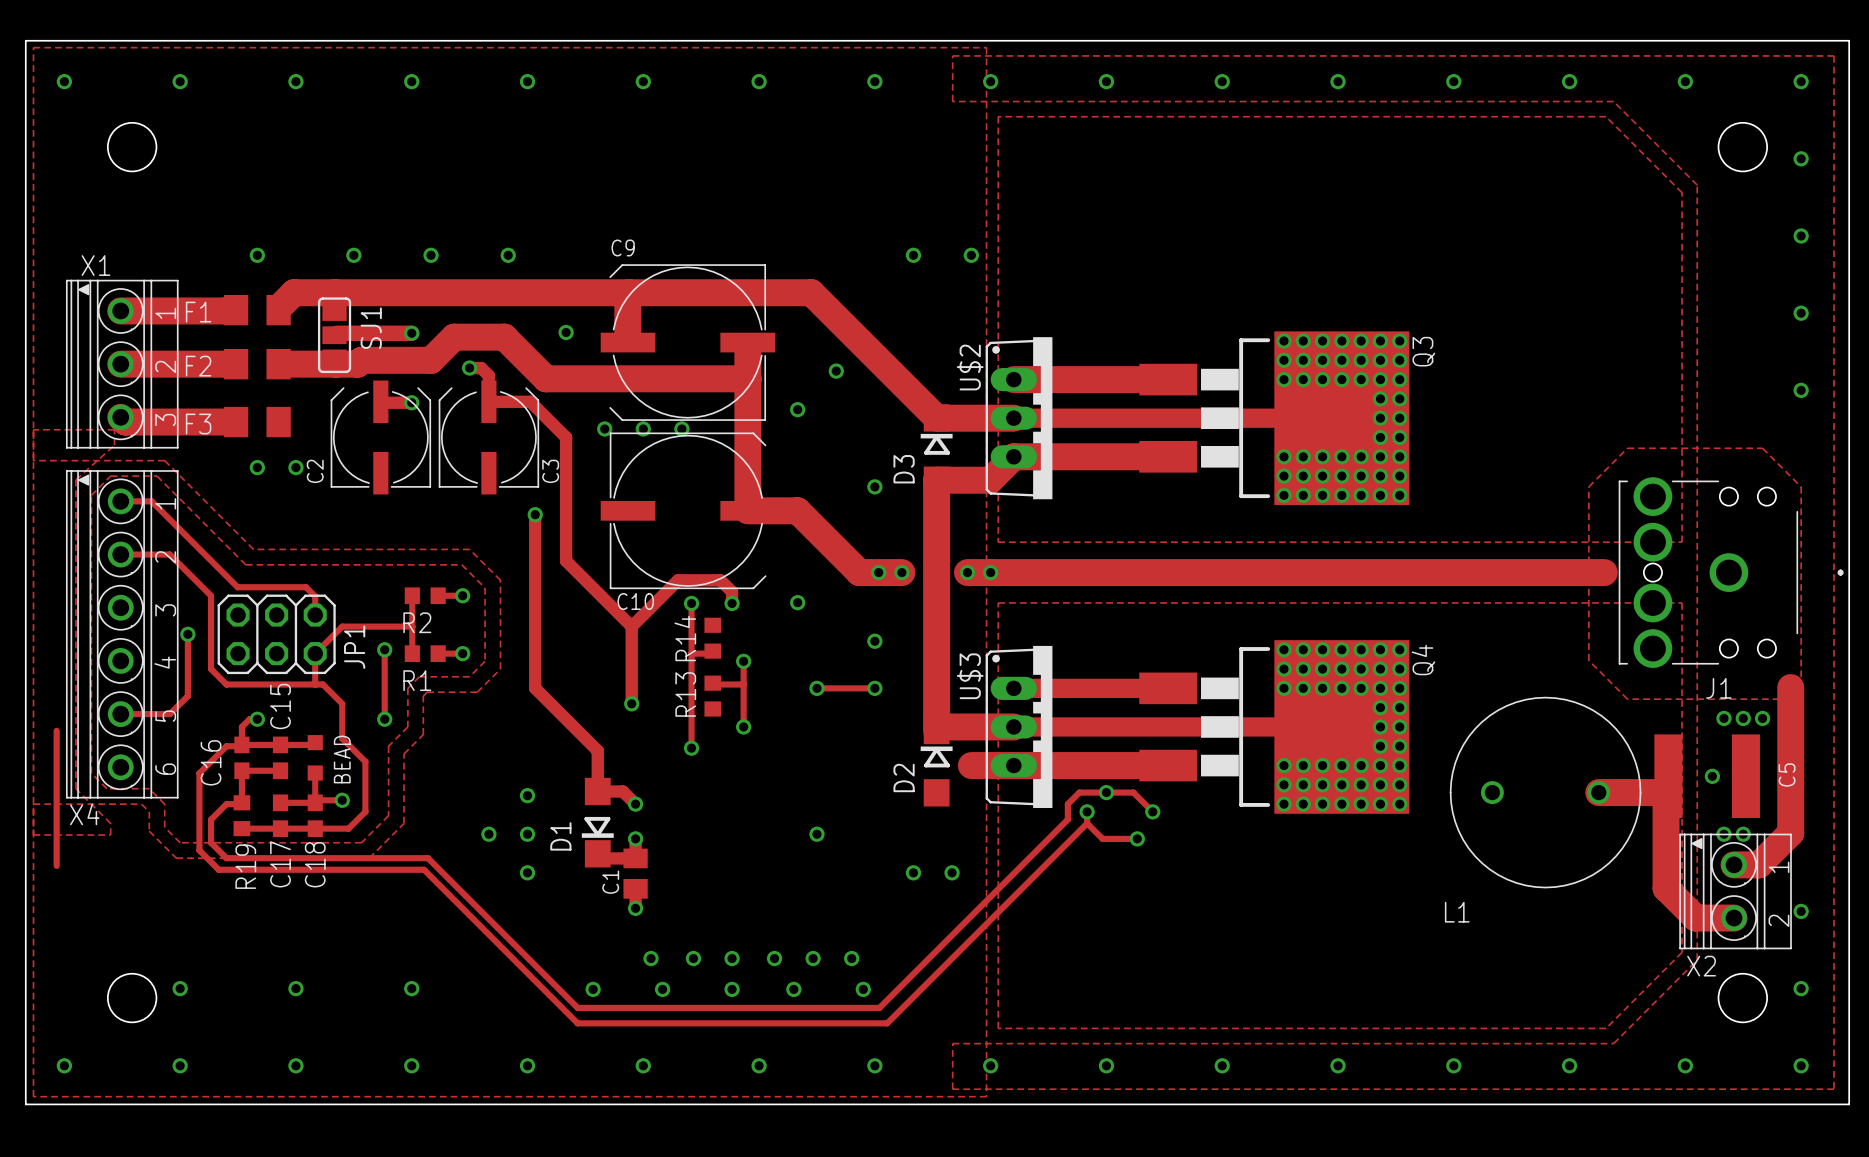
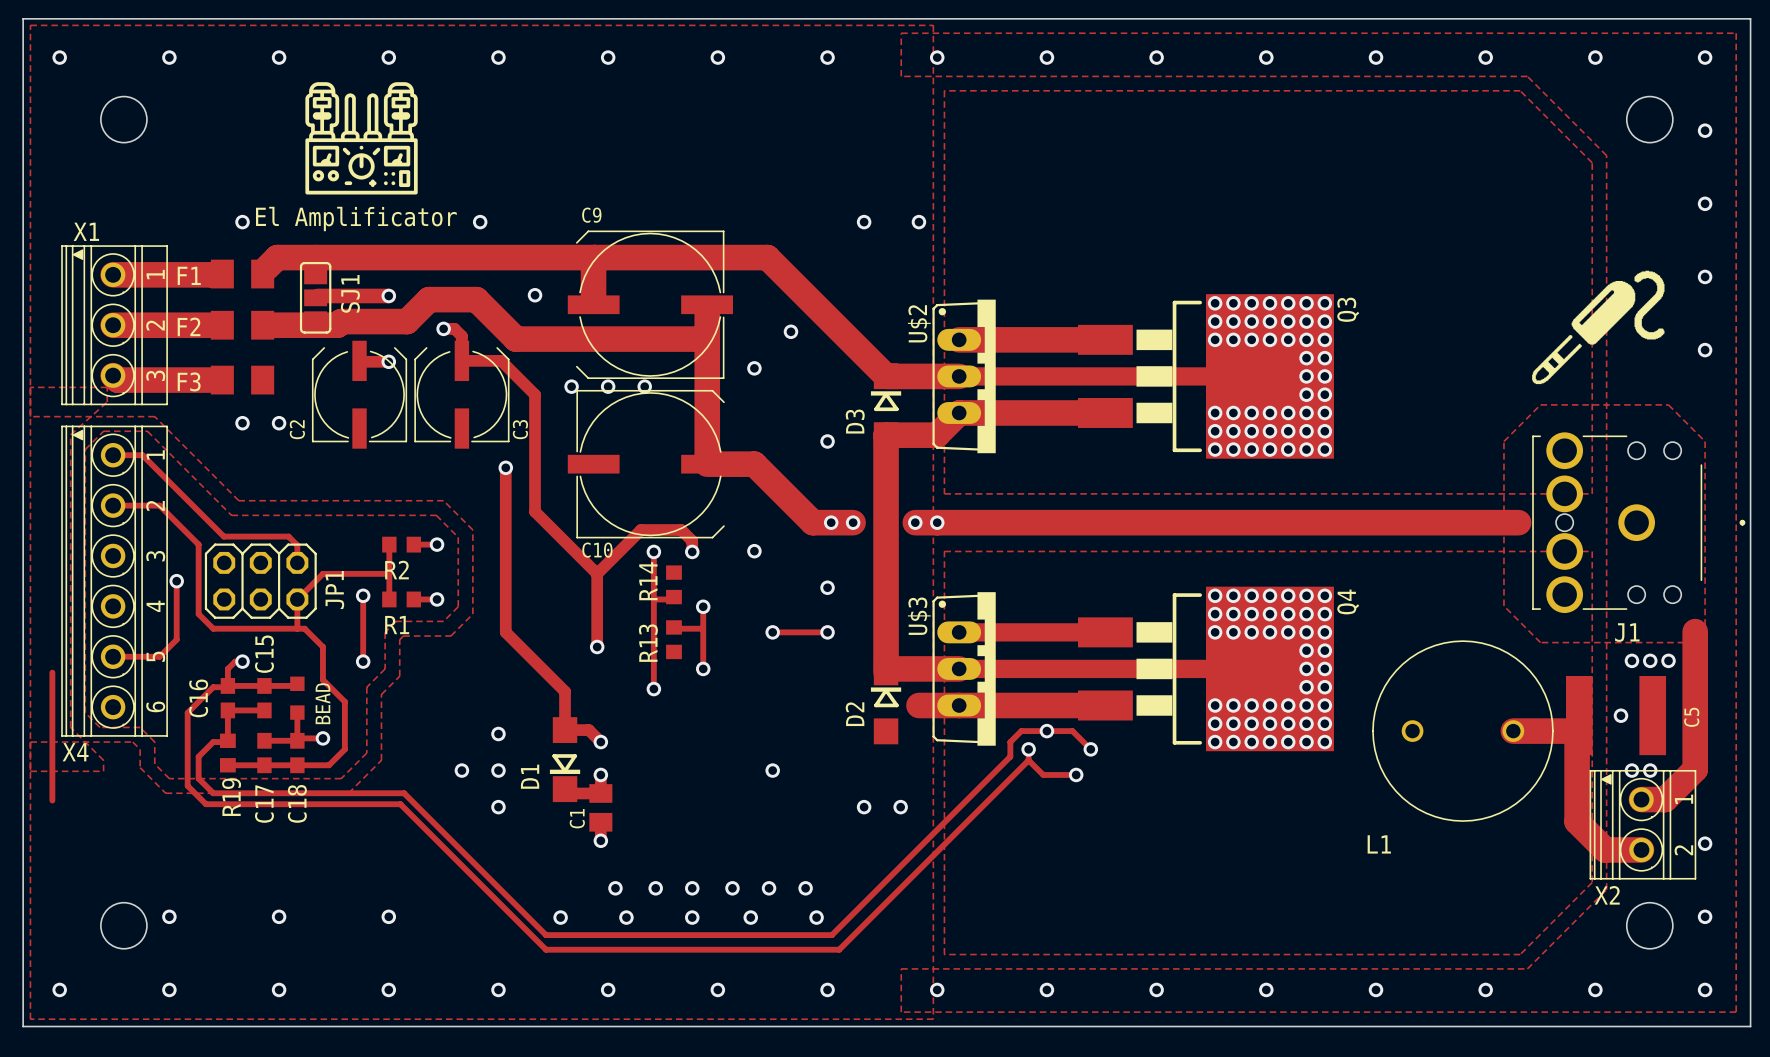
drawing: none -> [305, 82, 418, 195]
text: none -> El Amplificator (356, 219)
via: (353, 255) -> none
via: (431, 255) -> none
drawing: none -> [1532, 270, 1665, 385]

